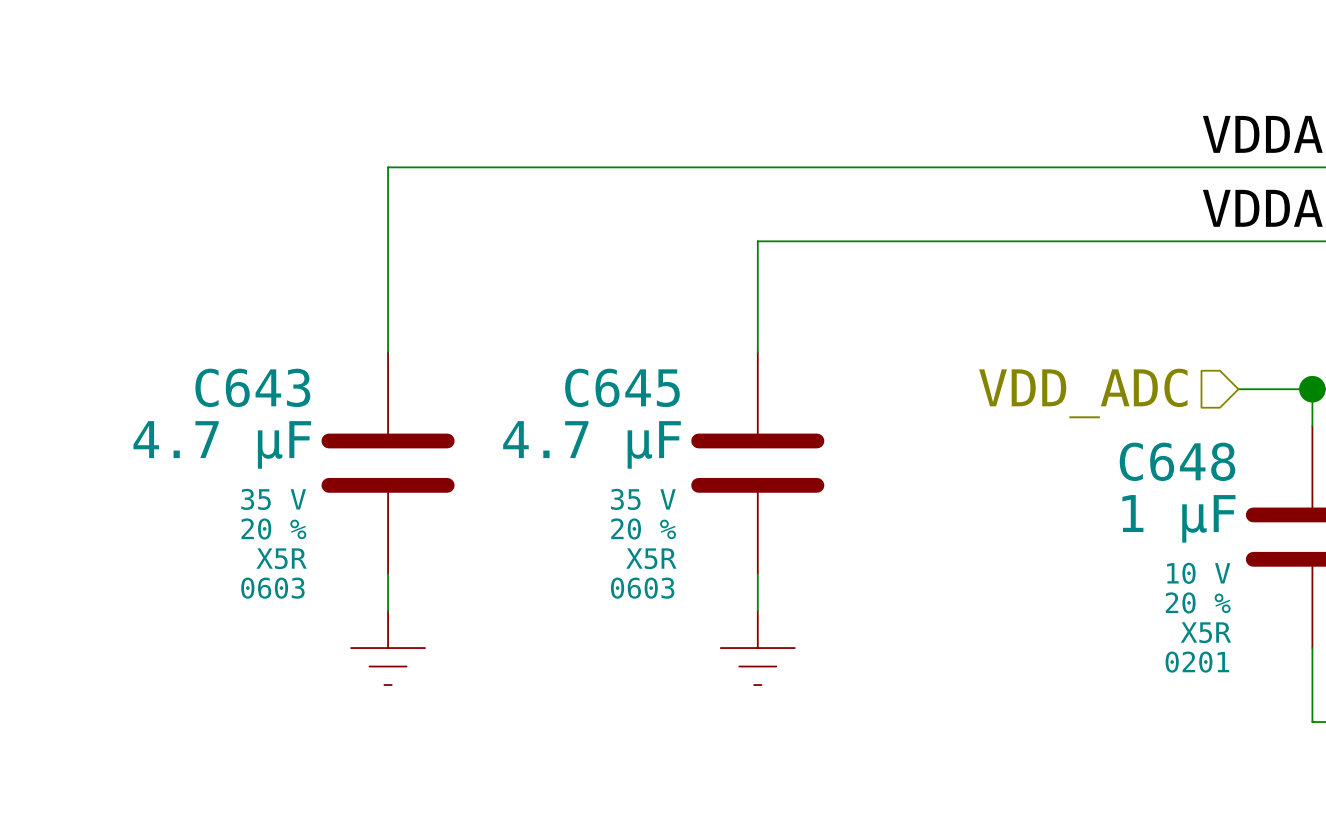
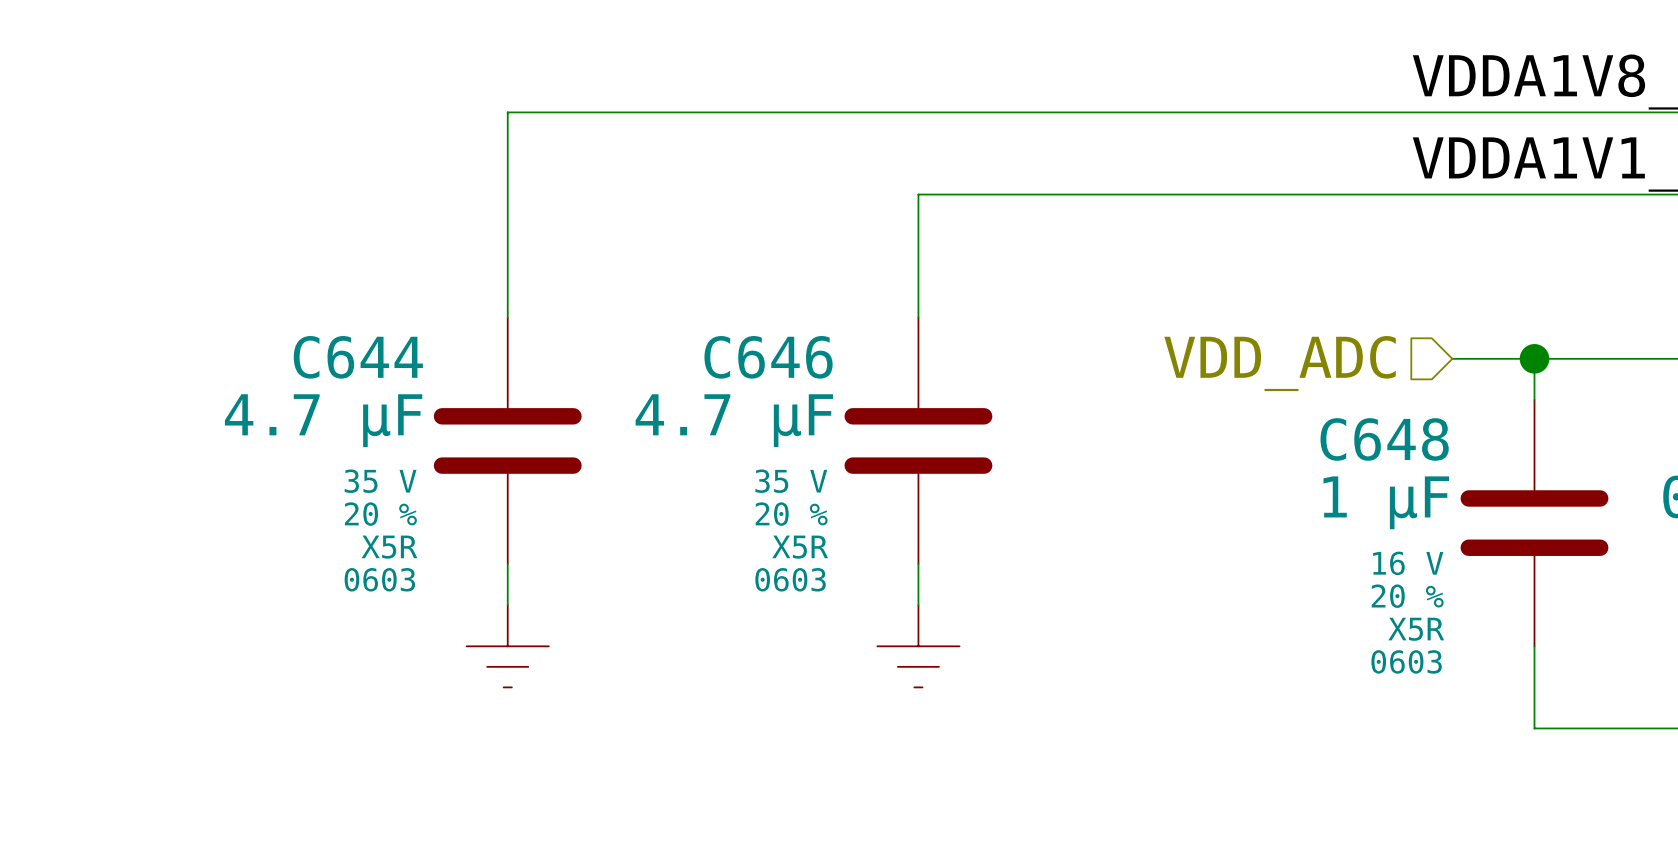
C643 name: C643 (252, 387) -> C644 (358, 357)
C645 name: C645 (622, 387) -> C646 (768, 357)
C648 text: 10 V (1198, 573) -> 16 V (1408, 563)
C648 text: 0201 (1197, 662) -> 0603 (1406, 661)

